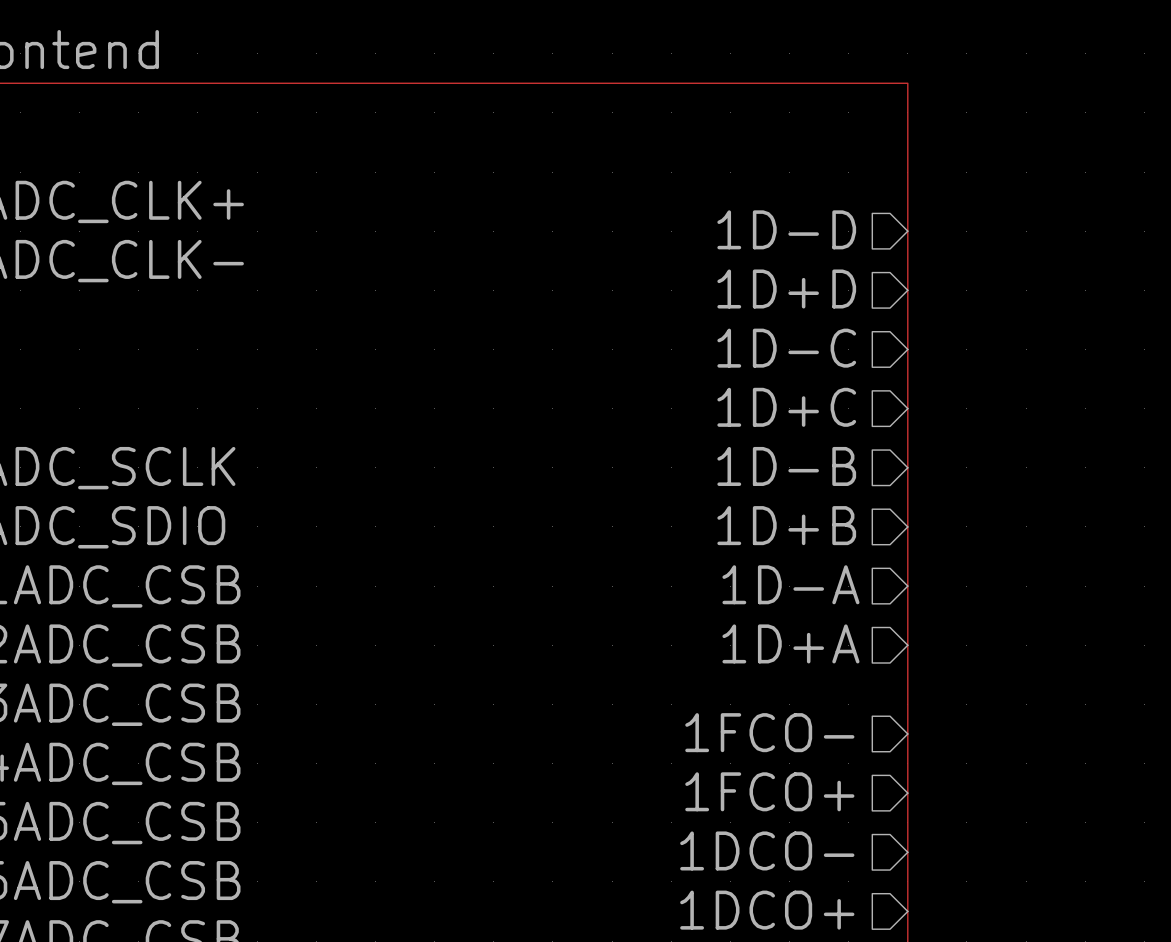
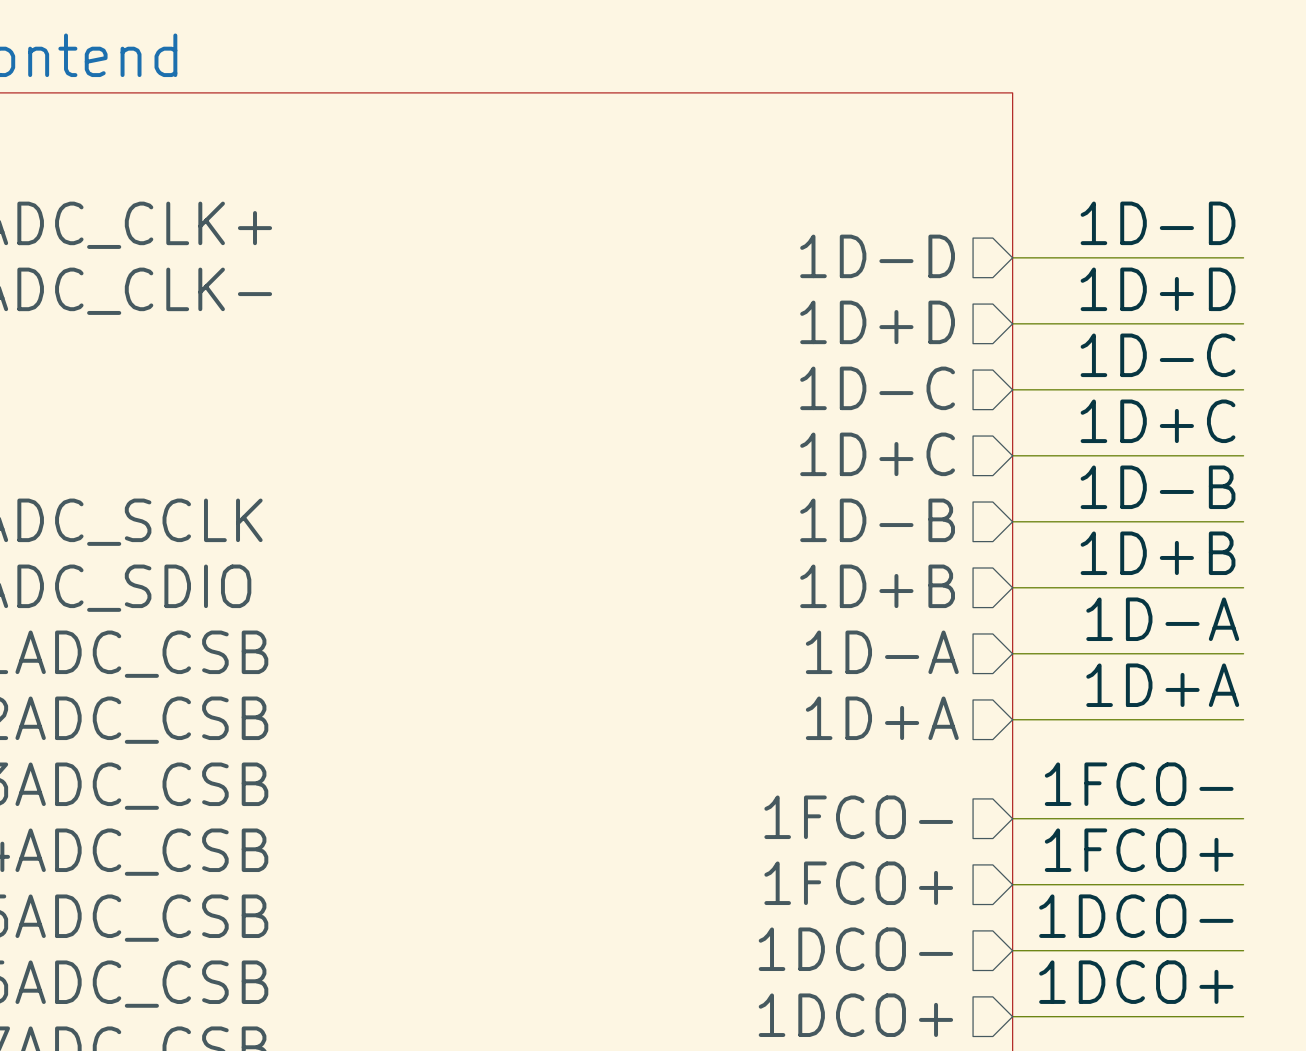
label: none -> 1D-D (1158, 223)
wire: none -> (1012, 257) (1243, 257)
label: none -> 1D+D (1158, 289)
wire: none -> (1012, 323) (1243, 323)
label: none -> 1D-C (1158, 355)
wire: none -> (1012, 389) (1243, 389)
label: none -> 1D+C (1158, 421)
wire: none -> (1012, 455) (1243, 455)
label: none -> 1D-B (1158, 487)
wire: none -> (1012, 521) (1243, 521)
label: none -> 1D+B (1158, 553)
wire: none -> (1012, 587) (1243, 587)
label: none -> 1D-A (1162, 619)
wire: none -> (1012, 653) (1243, 653)
label: none -> 1D+A (1162, 685)
wire: none -> (1012, 719) (1243, 719)
label: none -> 1FCO- (1139, 784)
wire: none -> (1012, 818) (1243, 818)
label: none -> 1FCO+ (1139, 850)
wire: none -> (1012, 884) (1243, 884)
label: none -> 1DCO- (1136, 916)
wire: none -> (1012, 950) (1243, 950)
label: none -> 1DCO+ (1136, 982)
wire: none -> (1012, 1016) (1243, 1016)

